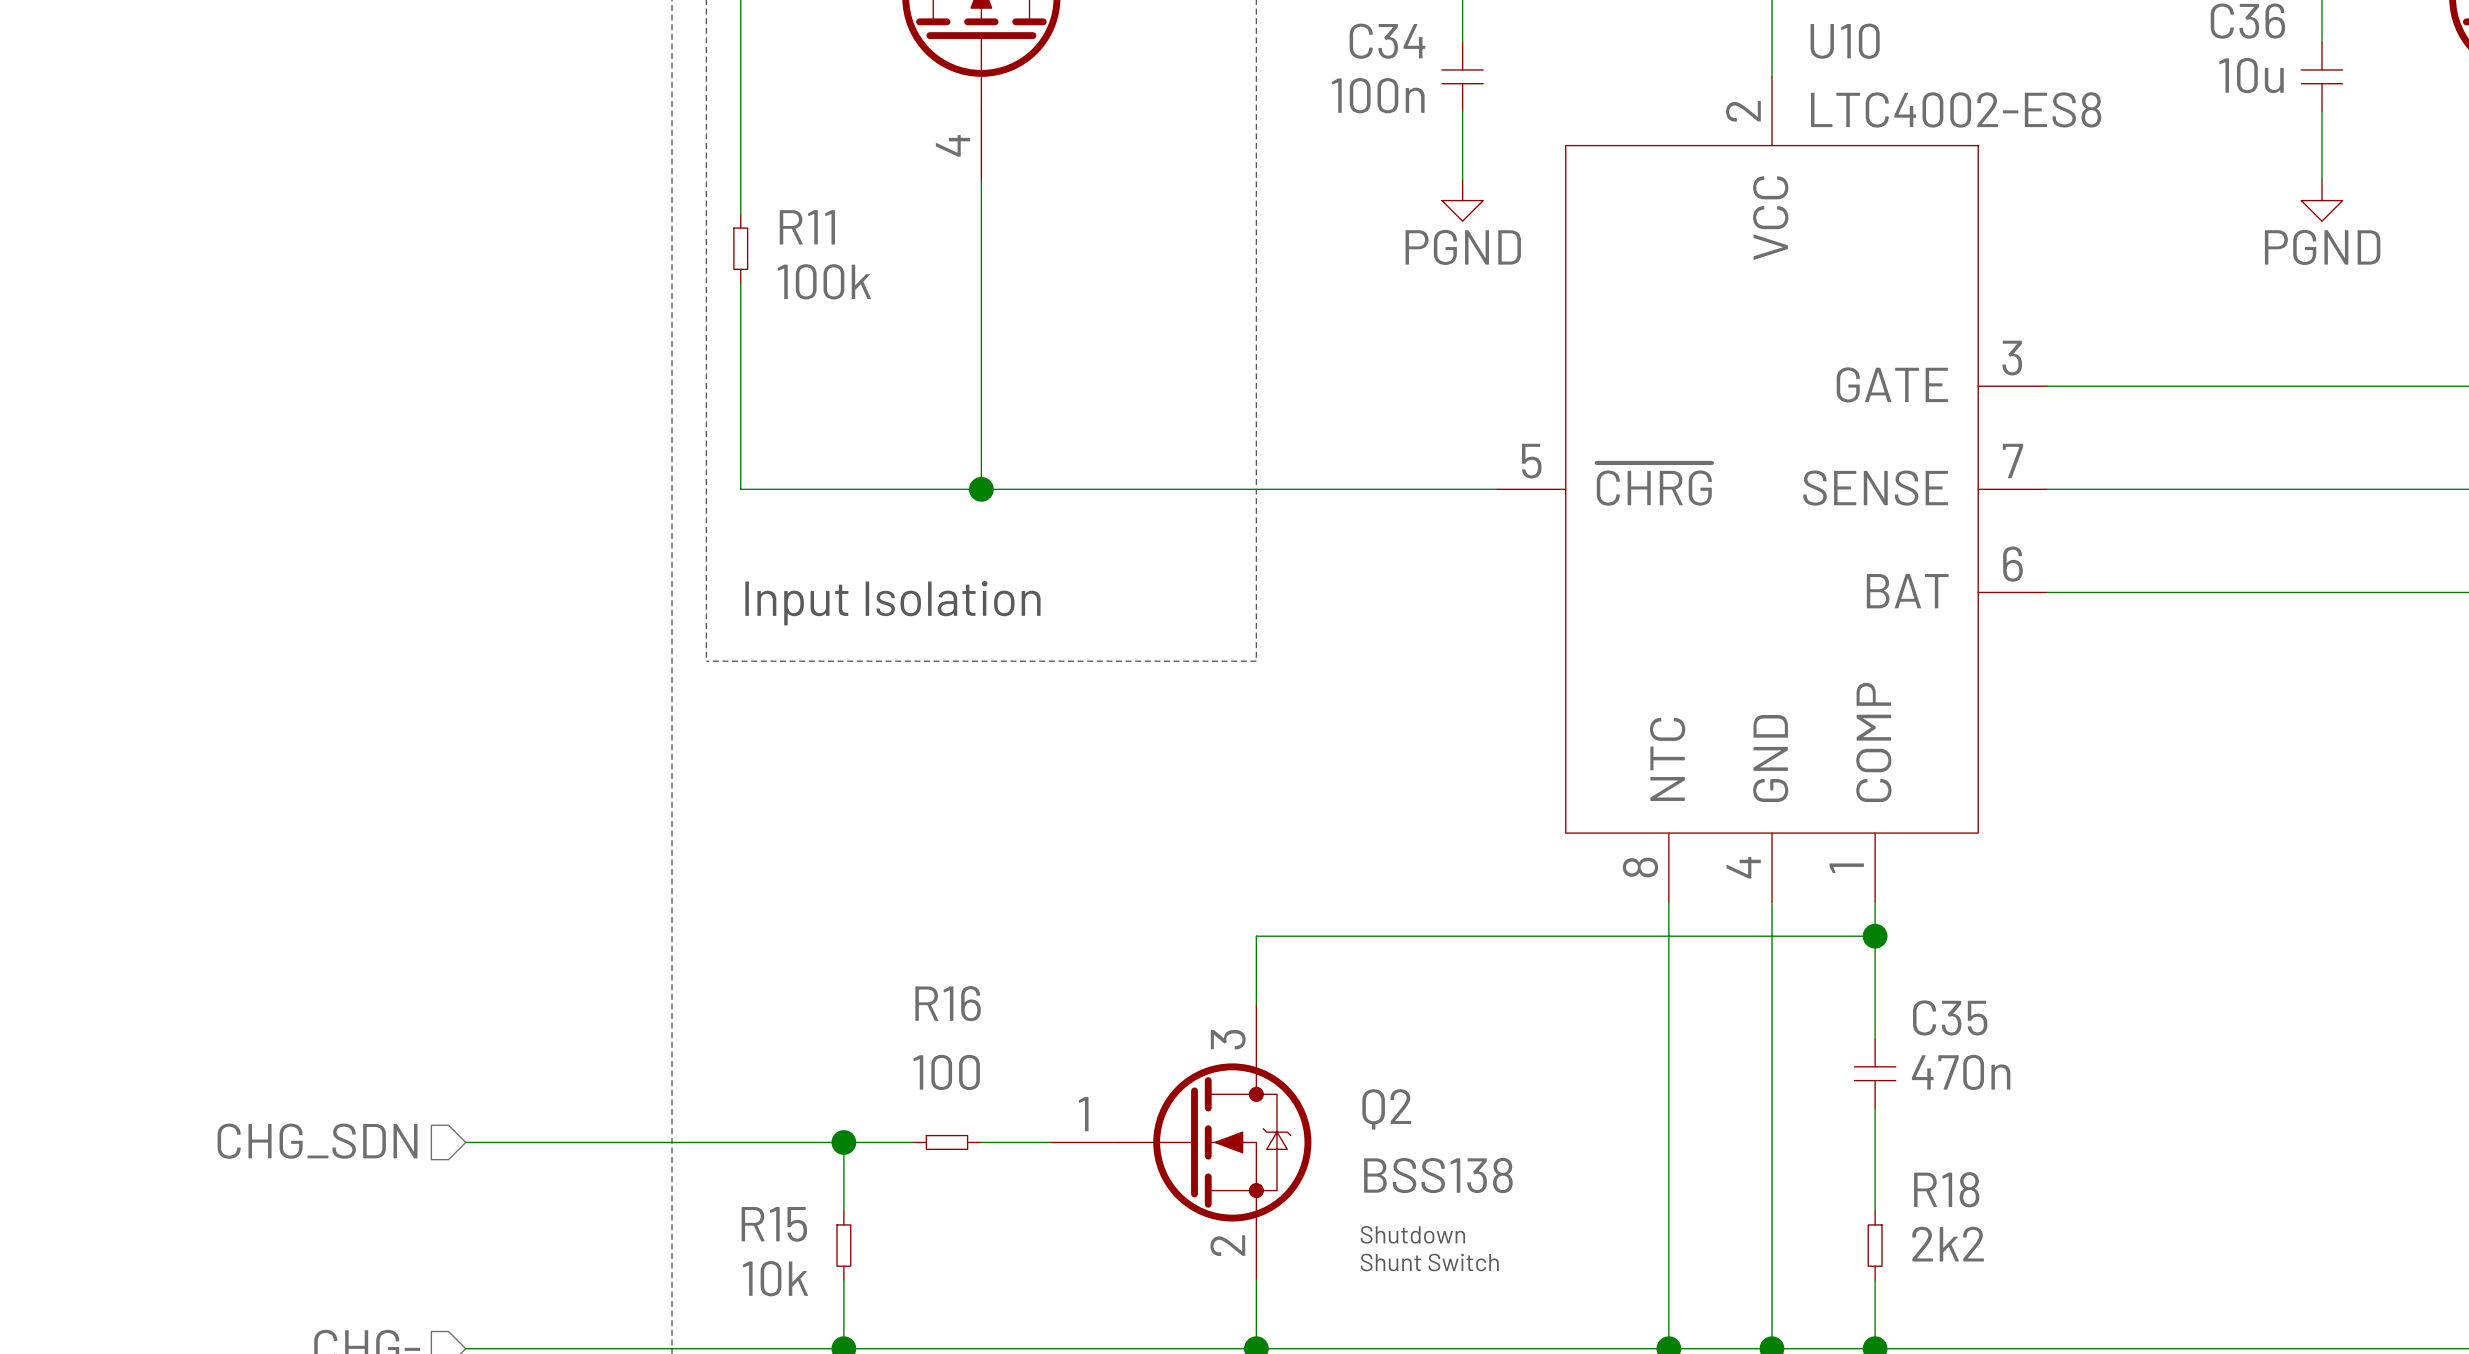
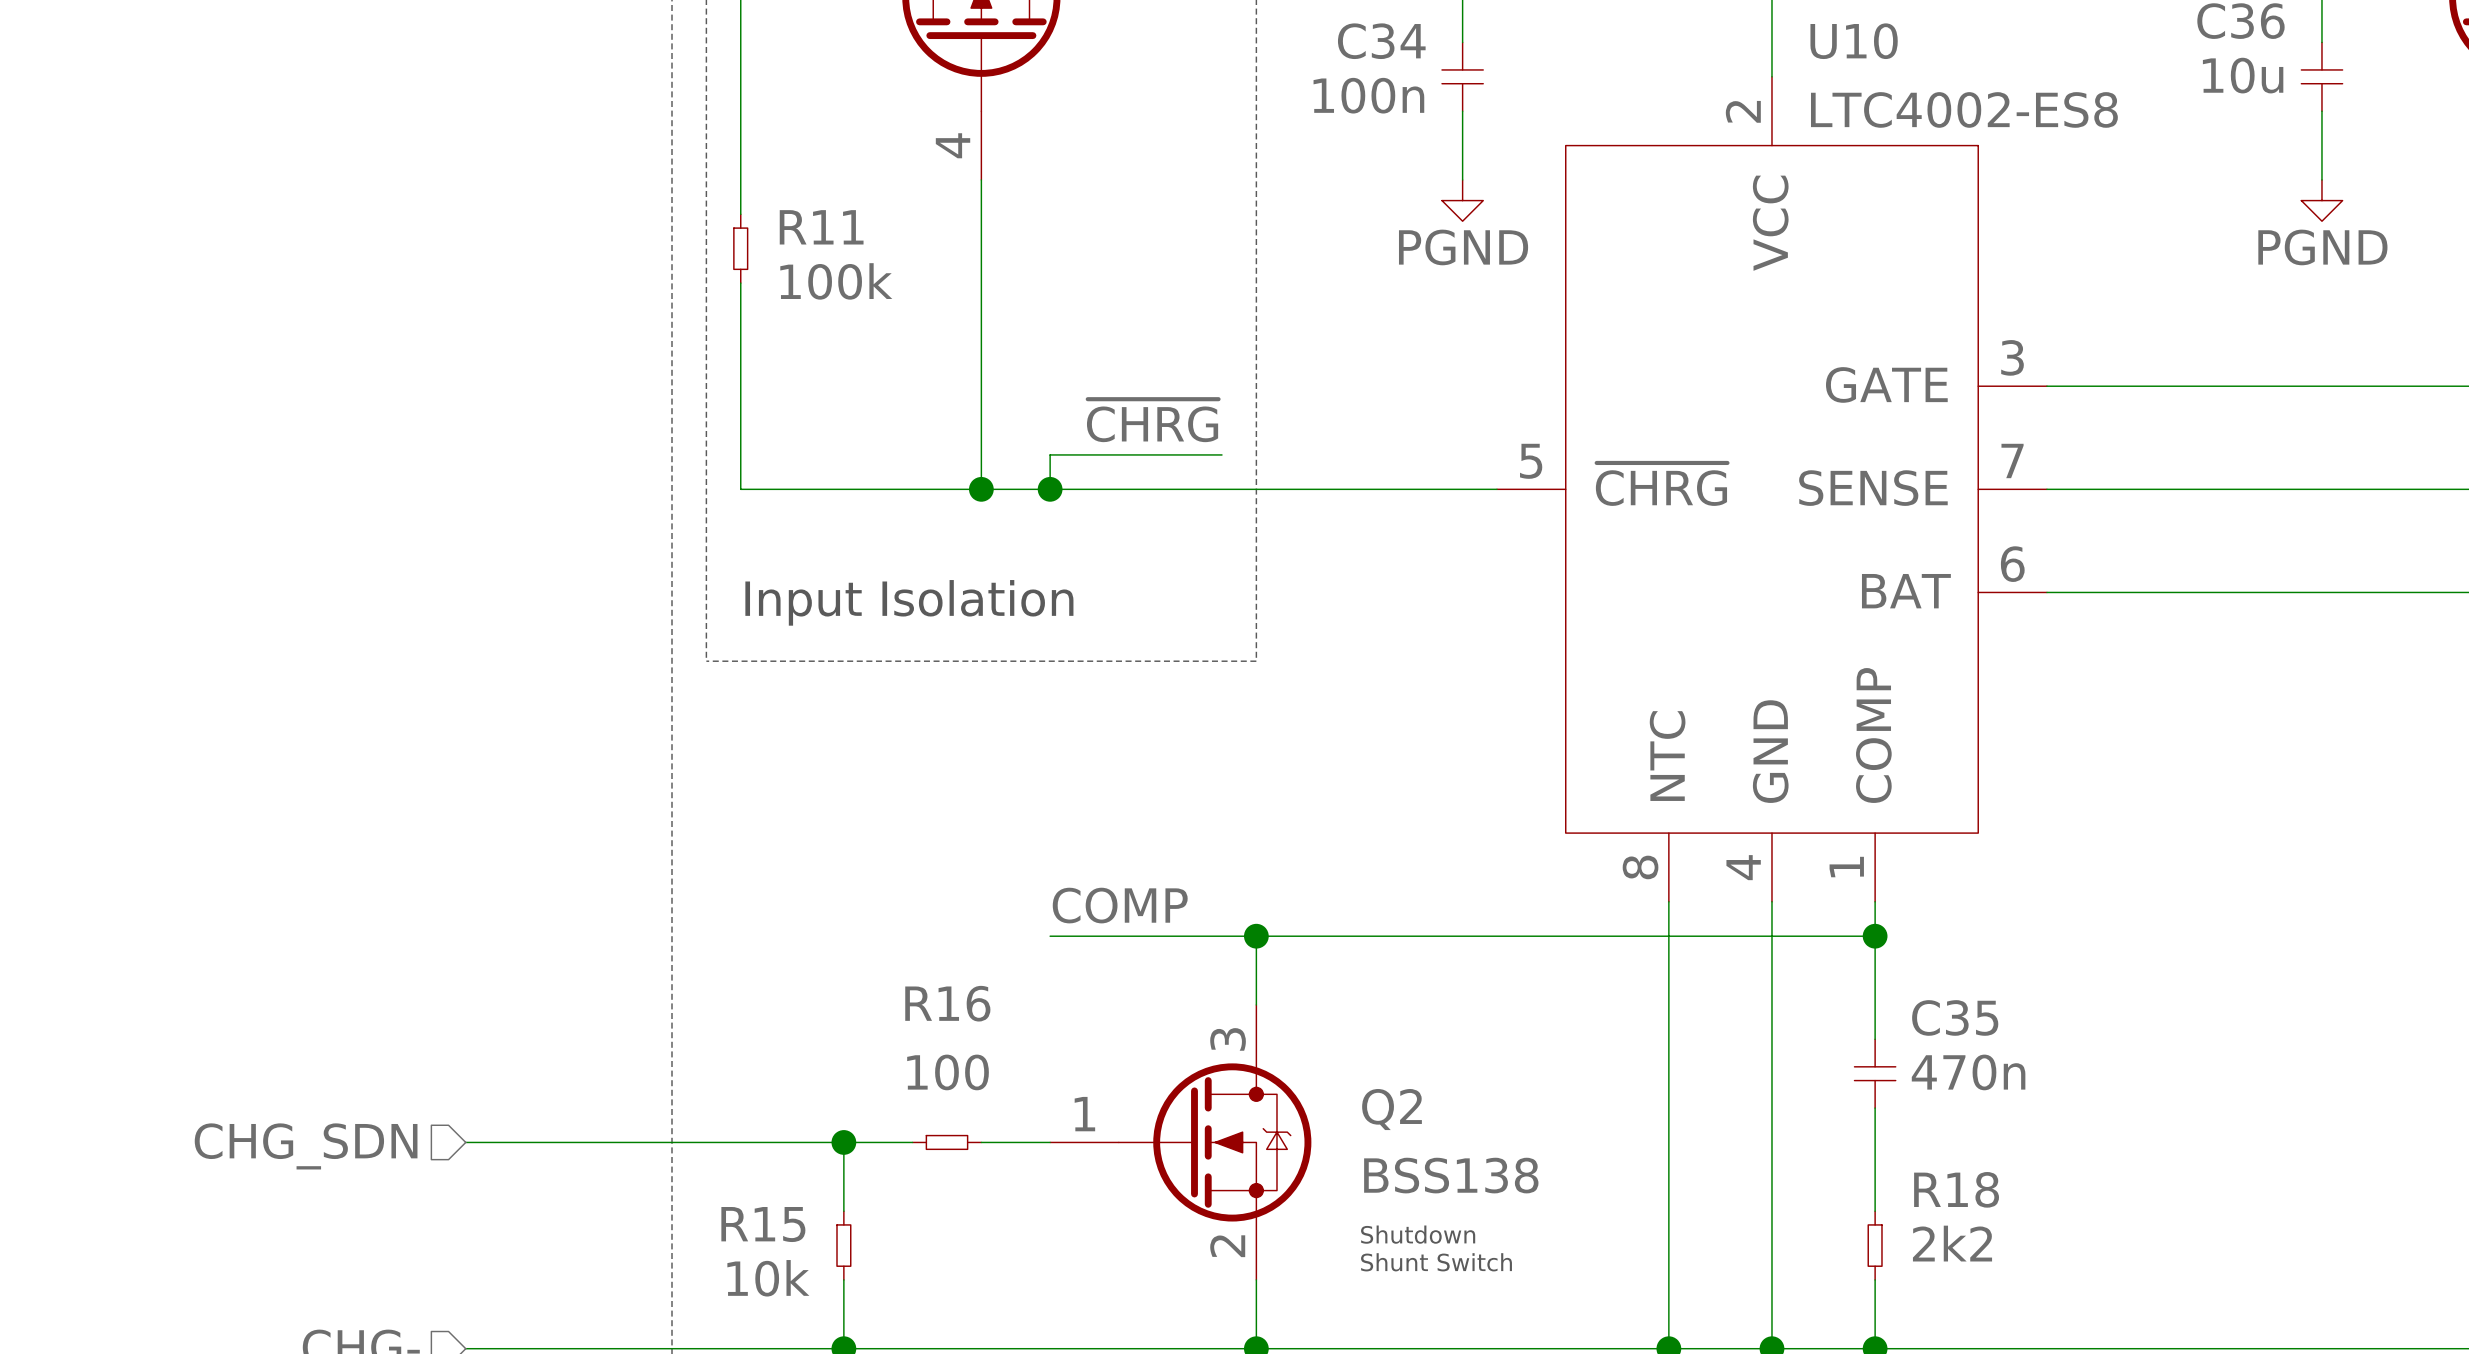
label: none -> ~{CHRG} (1152, 420)
wire: none -> (1221, 454) (1050, 454) (1050, 489)
junction: none -> (1050, 489)
label: none -> COMP (1120, 905)
wire: none -> (1050, 936) (1256, 936)
junction: none -> (1256, 936)

